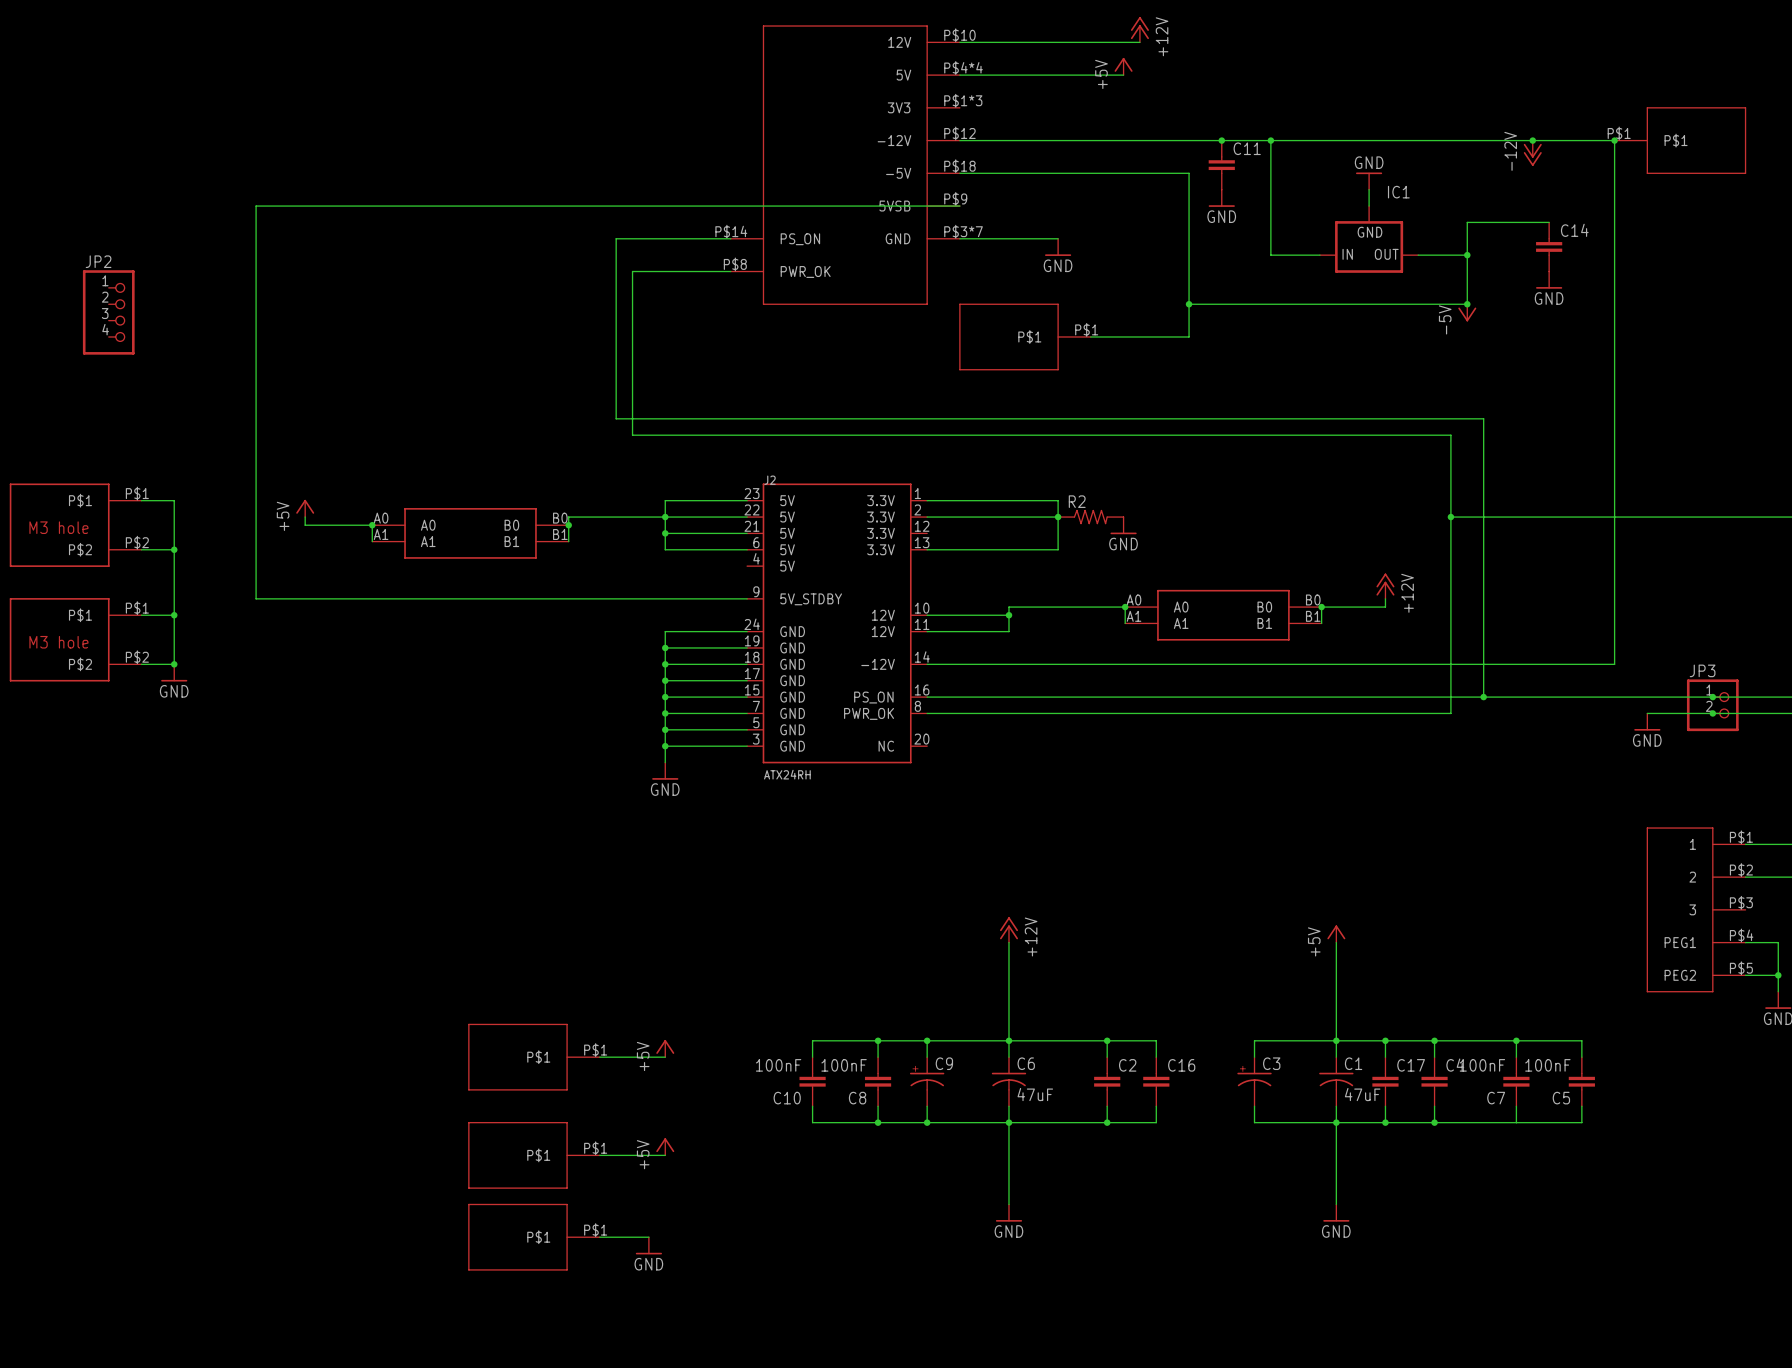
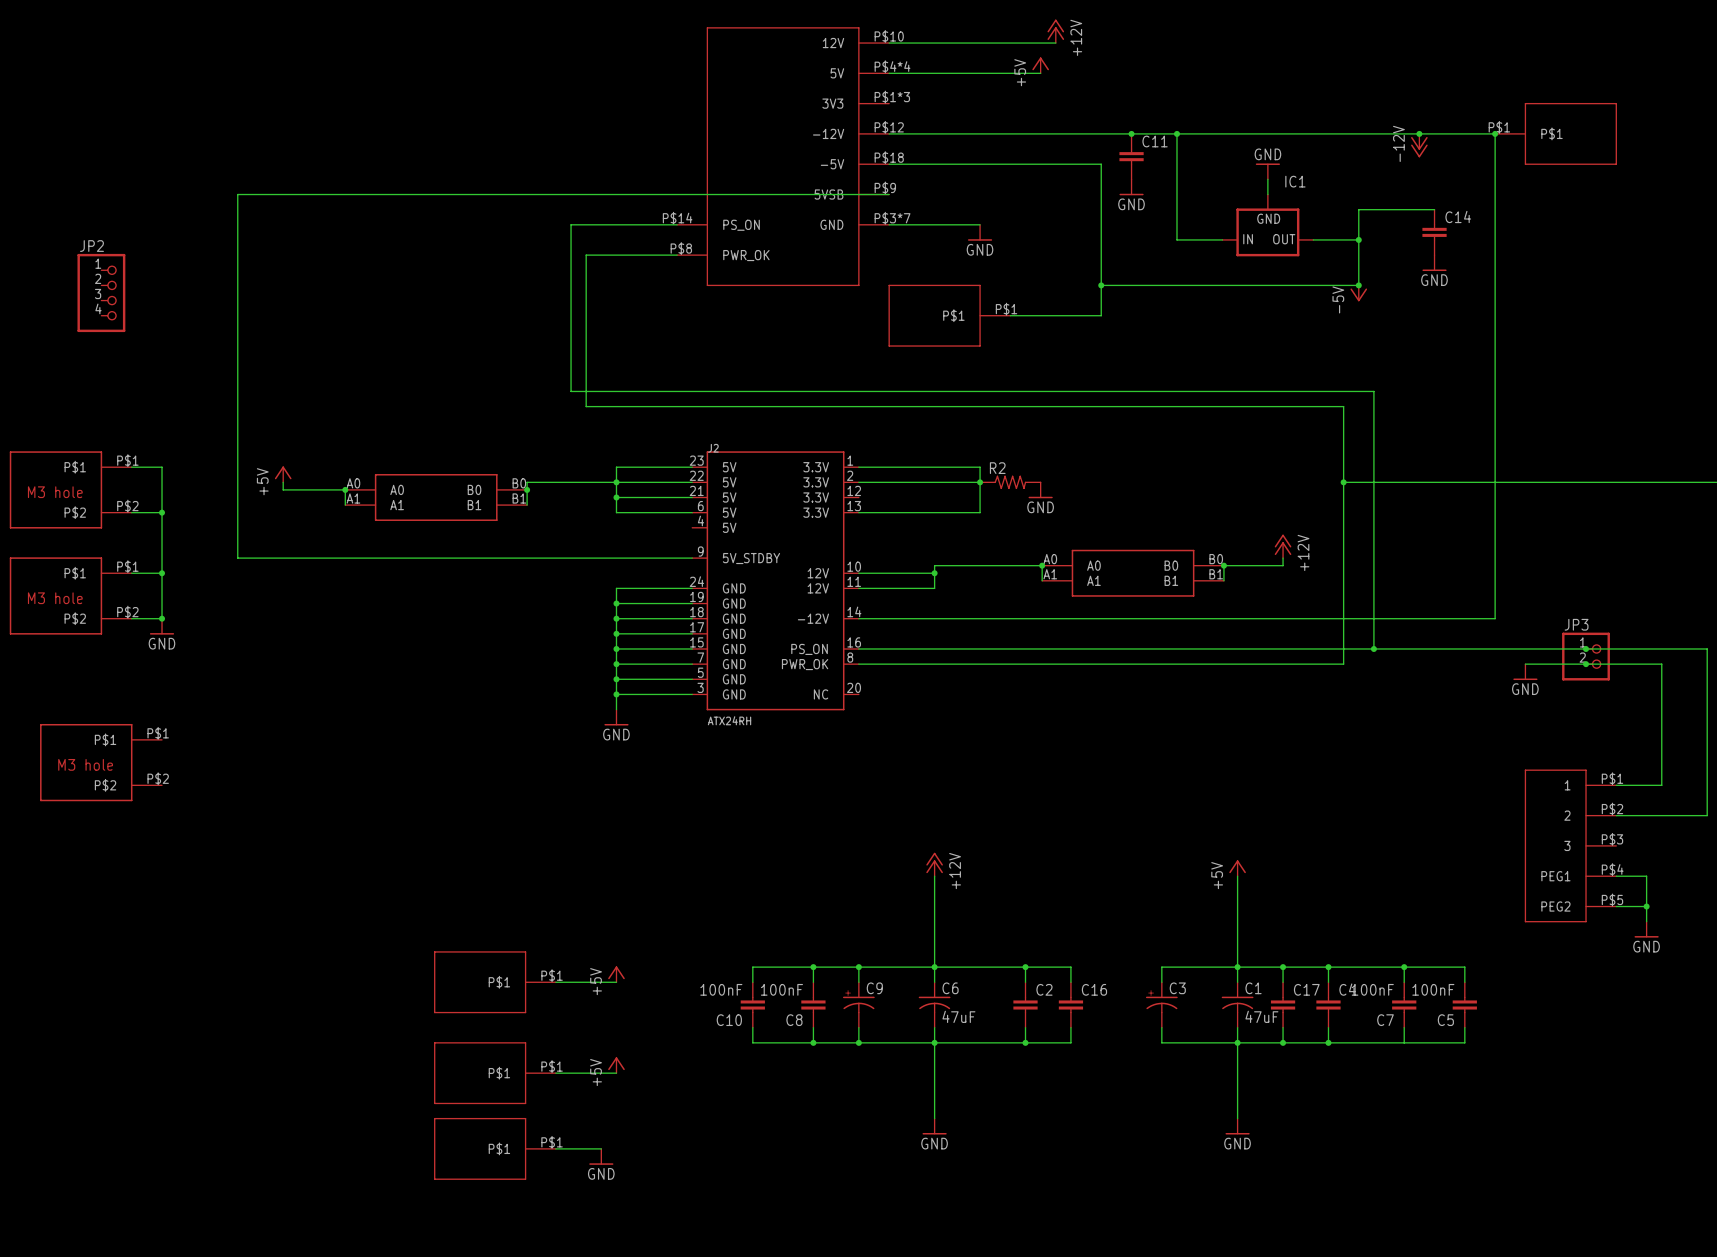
part: none -> (101, 762)

